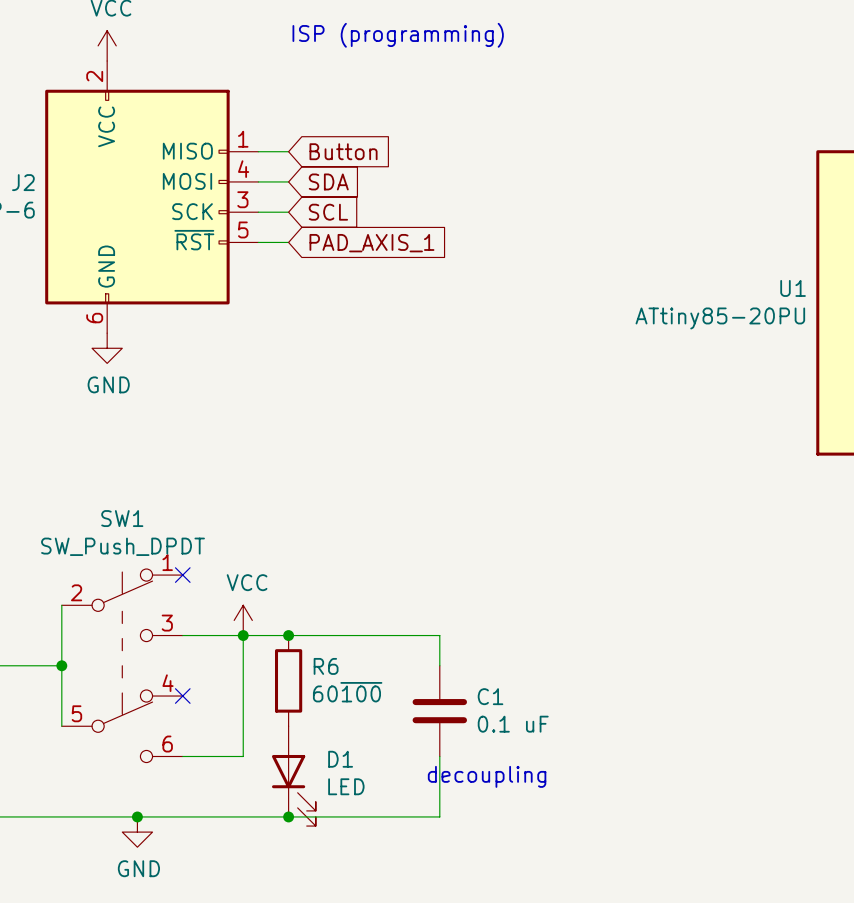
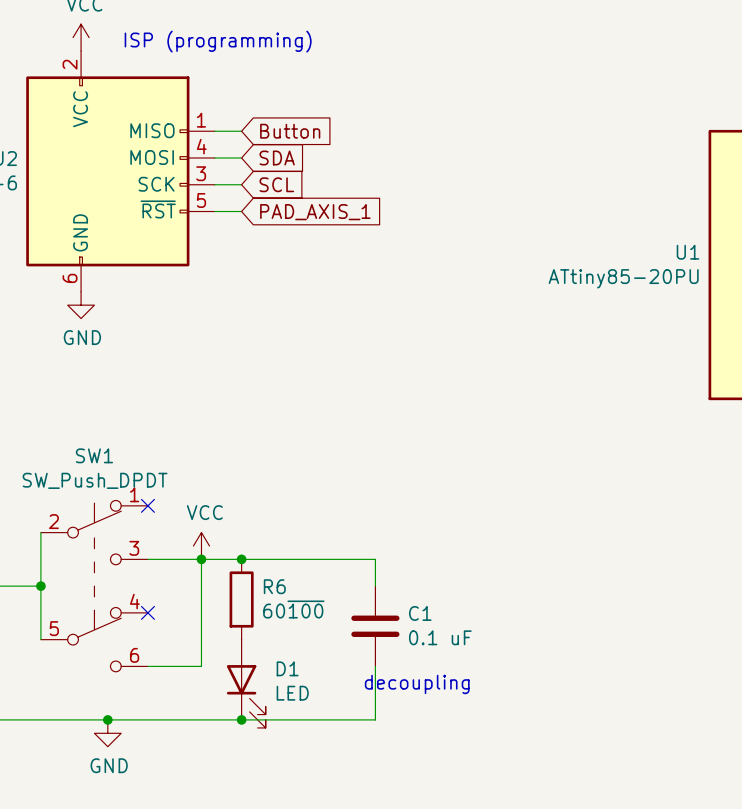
text position: ISP (programming) (398, 35) -> ISP (programming) (218, 41)

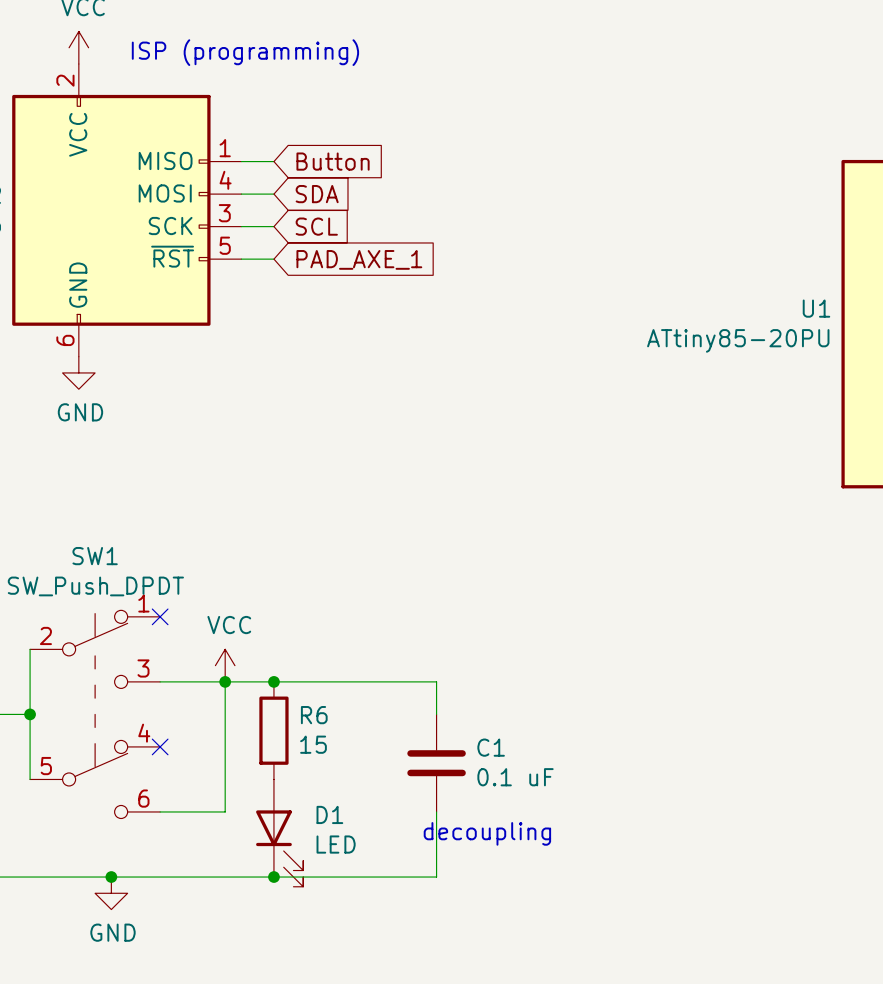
global label: PAD_AXIS_1 (315, 212) -> PAD_AXE_1 (359, 259)
R6 value: 60~{100} (293, 609) -> 15 (313, 744)

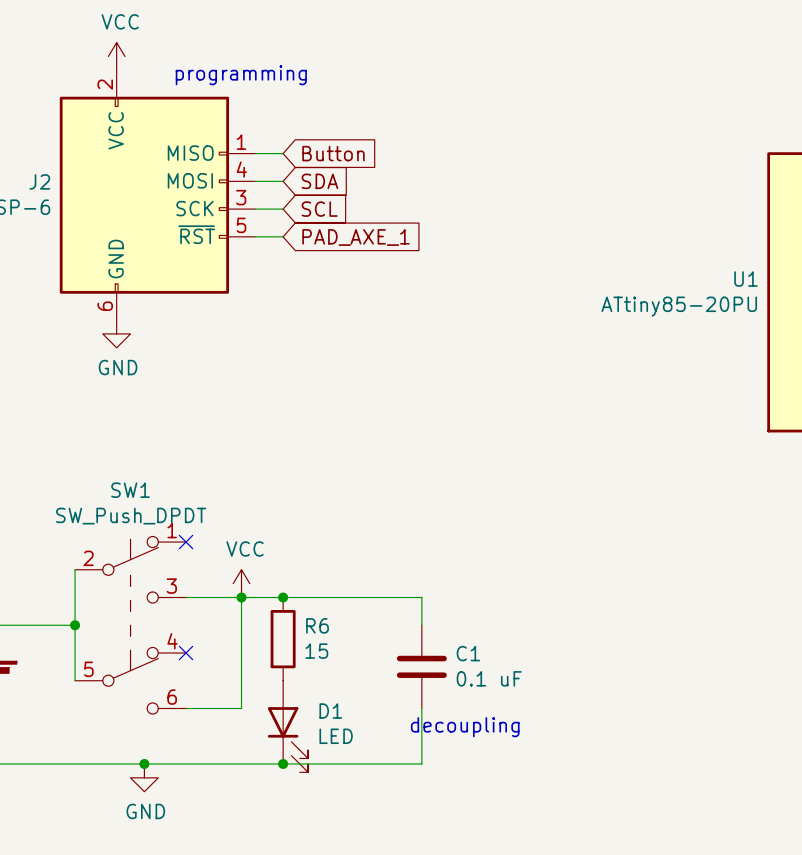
text: ISP (programming) (245, 52) -> programming (241, 75)

